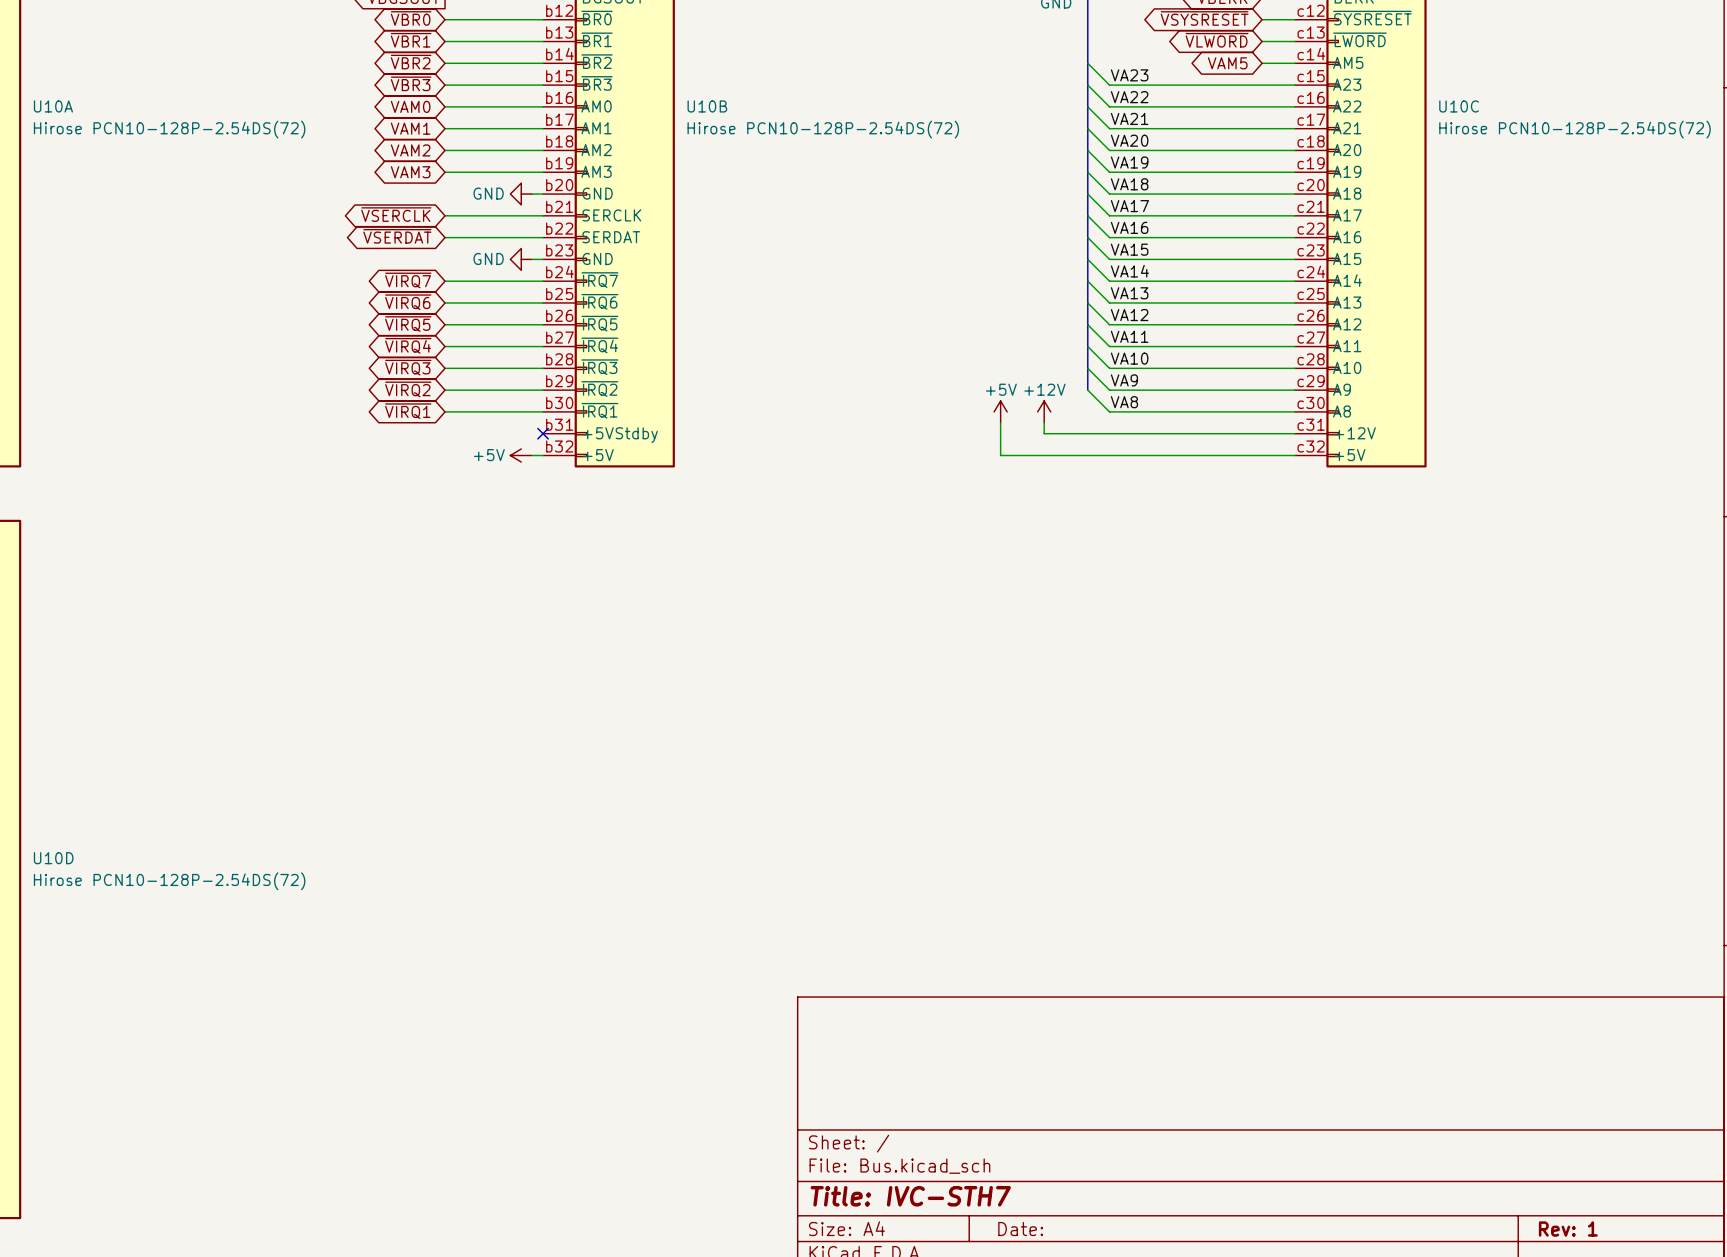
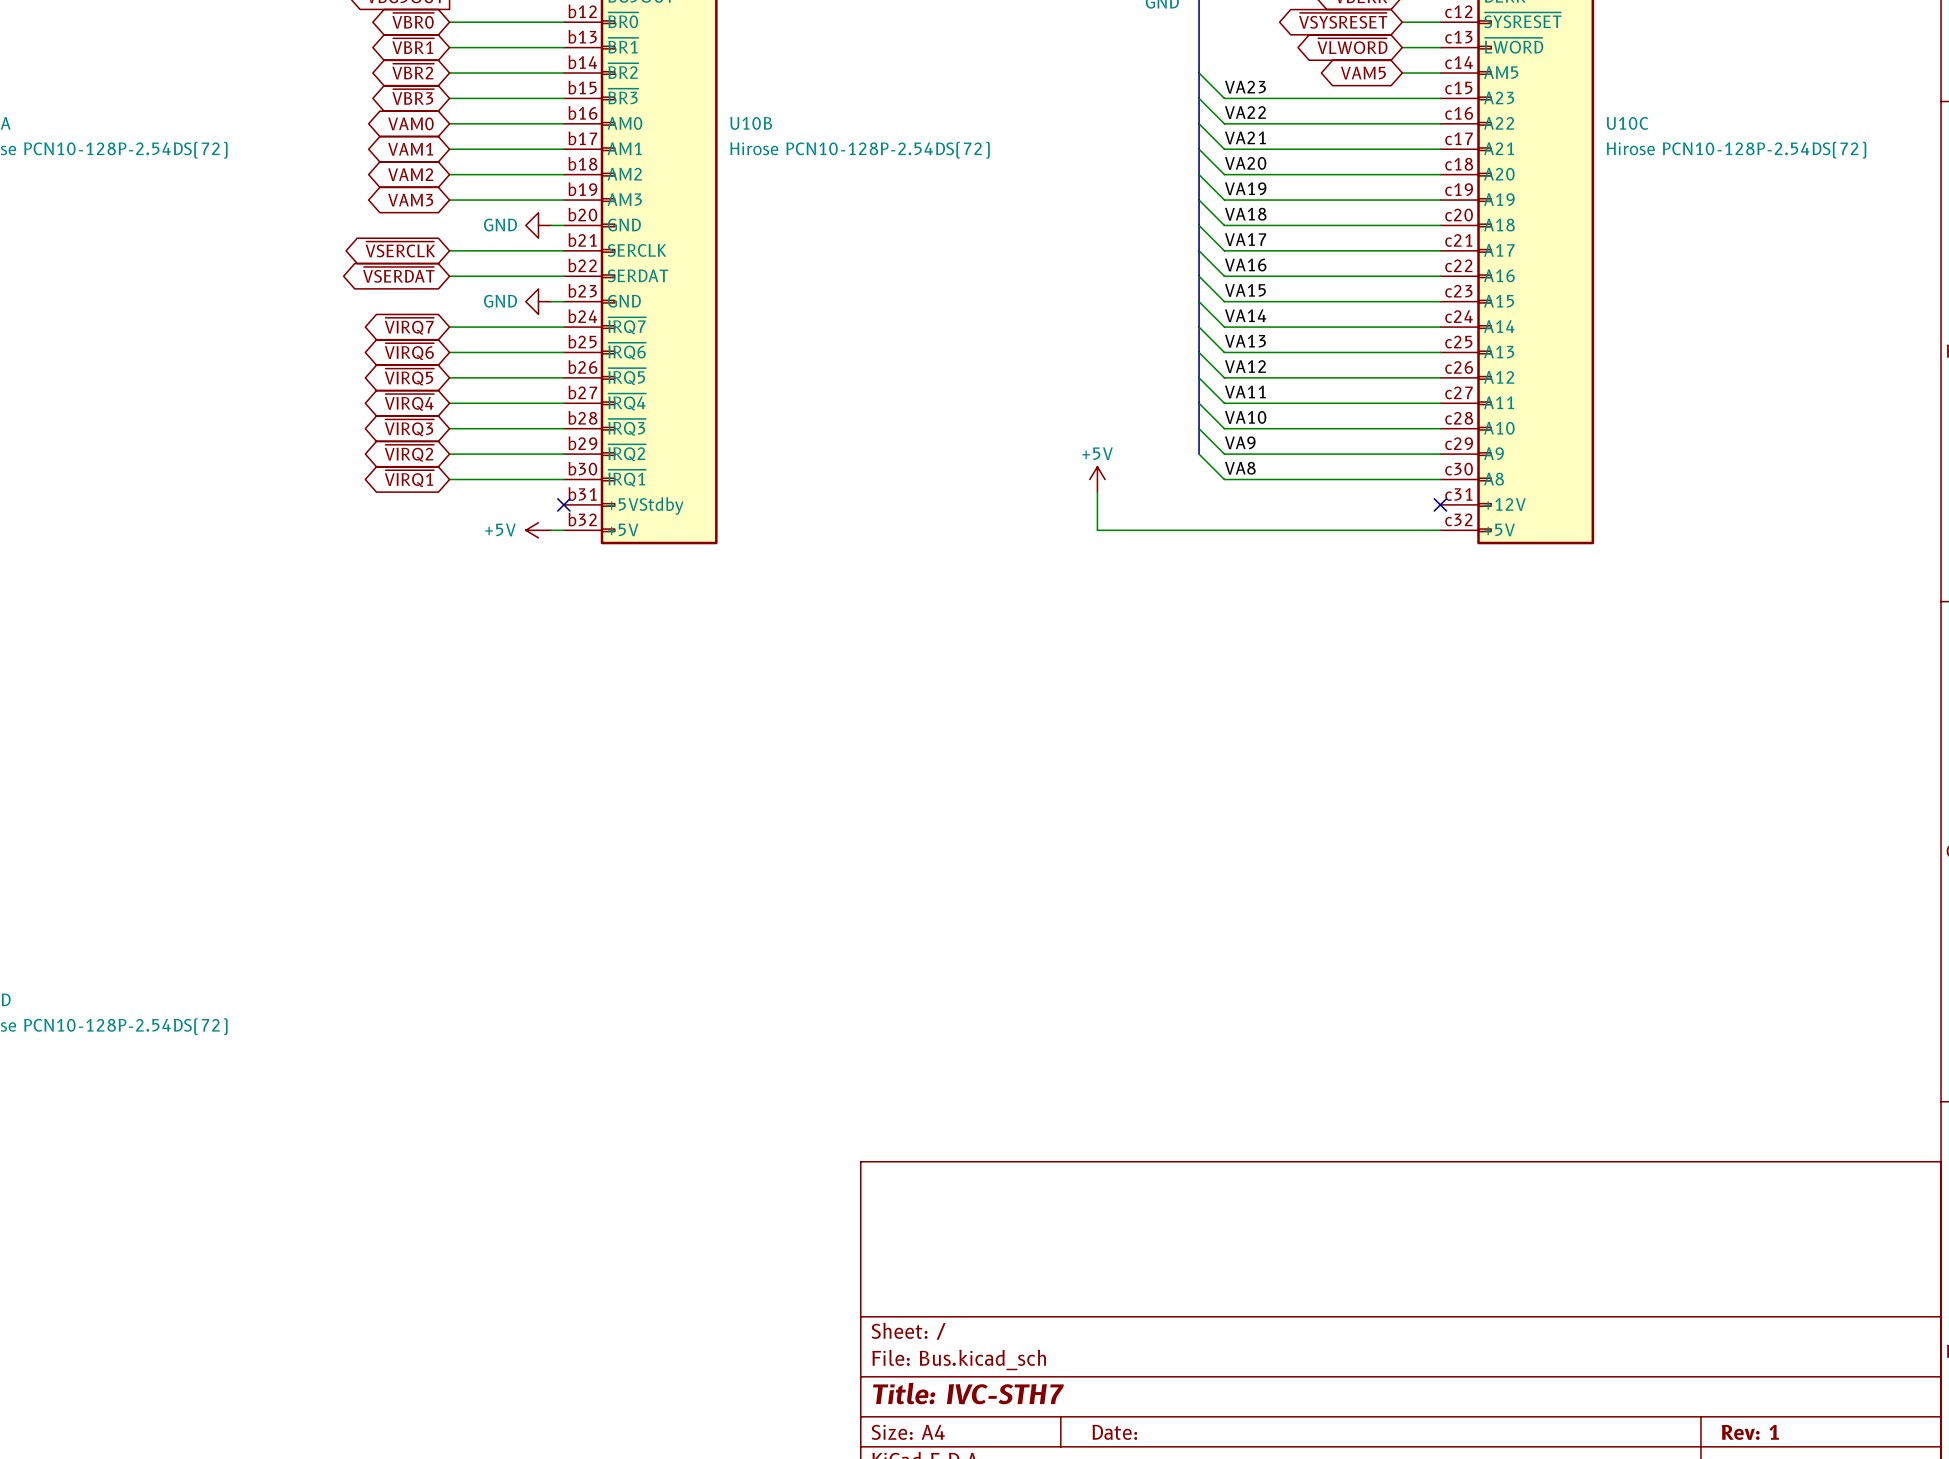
power symbol: +12V (1044, 411) -> none
wire: (1044, 422) (1044, 433) (1294, 433) -> none
no-connect mark: none -> (1440, 504)

